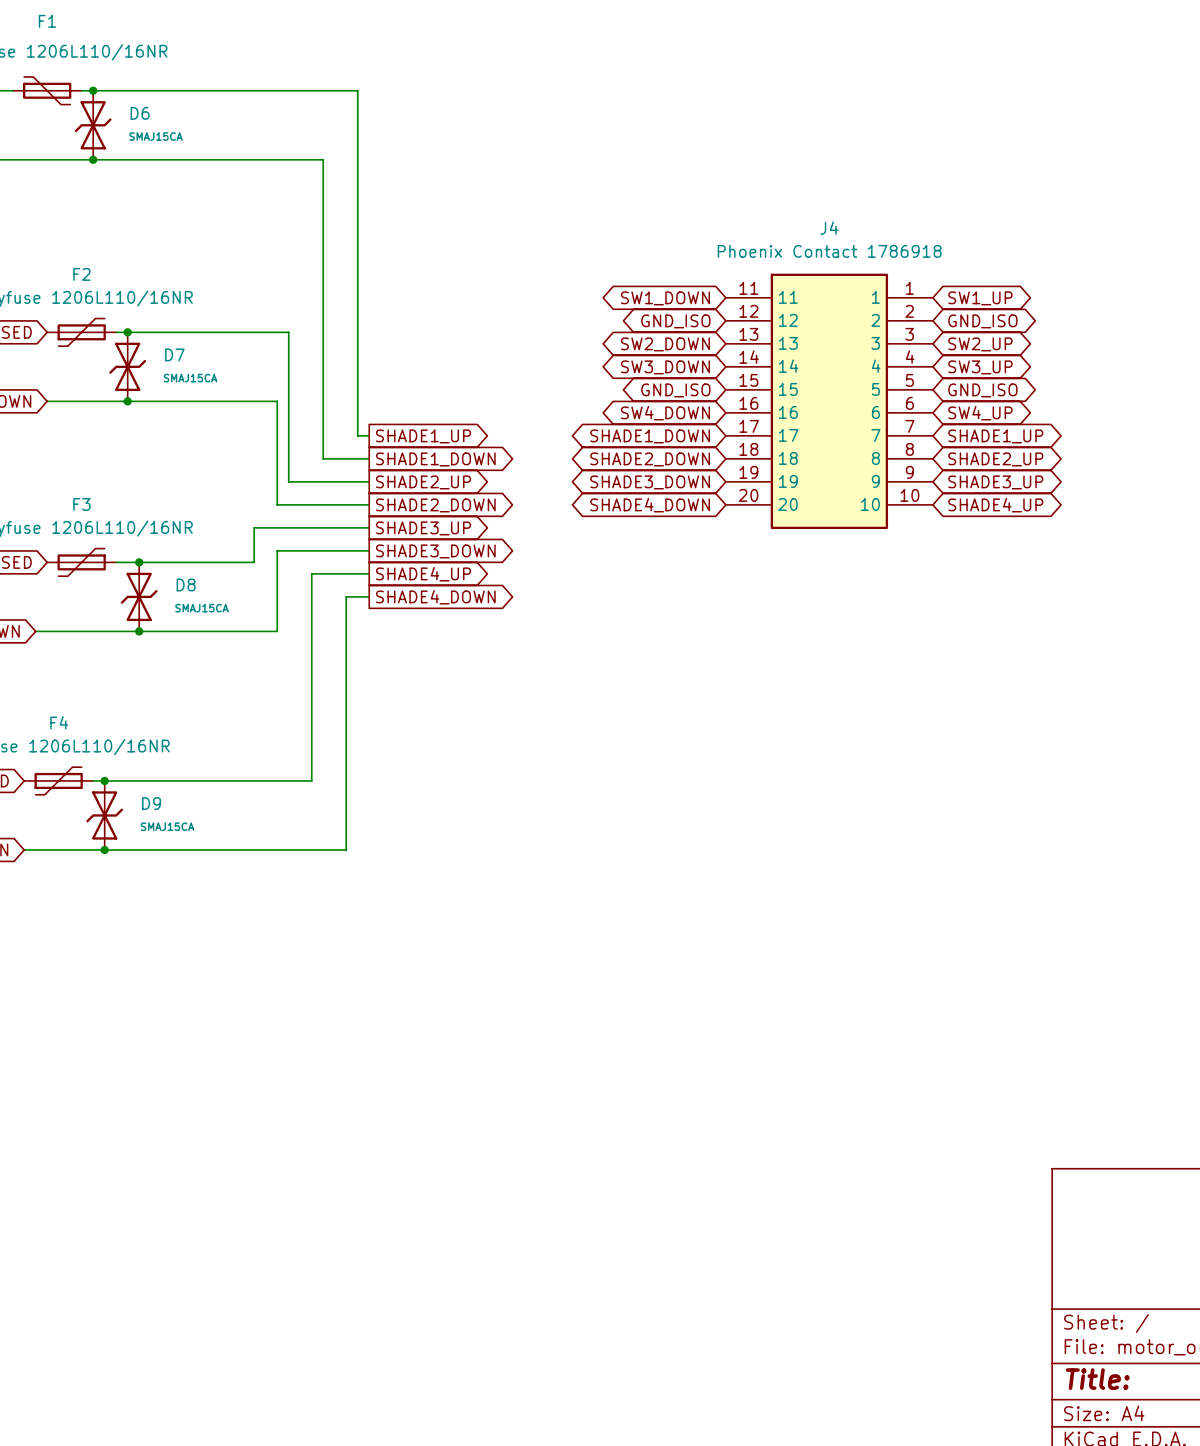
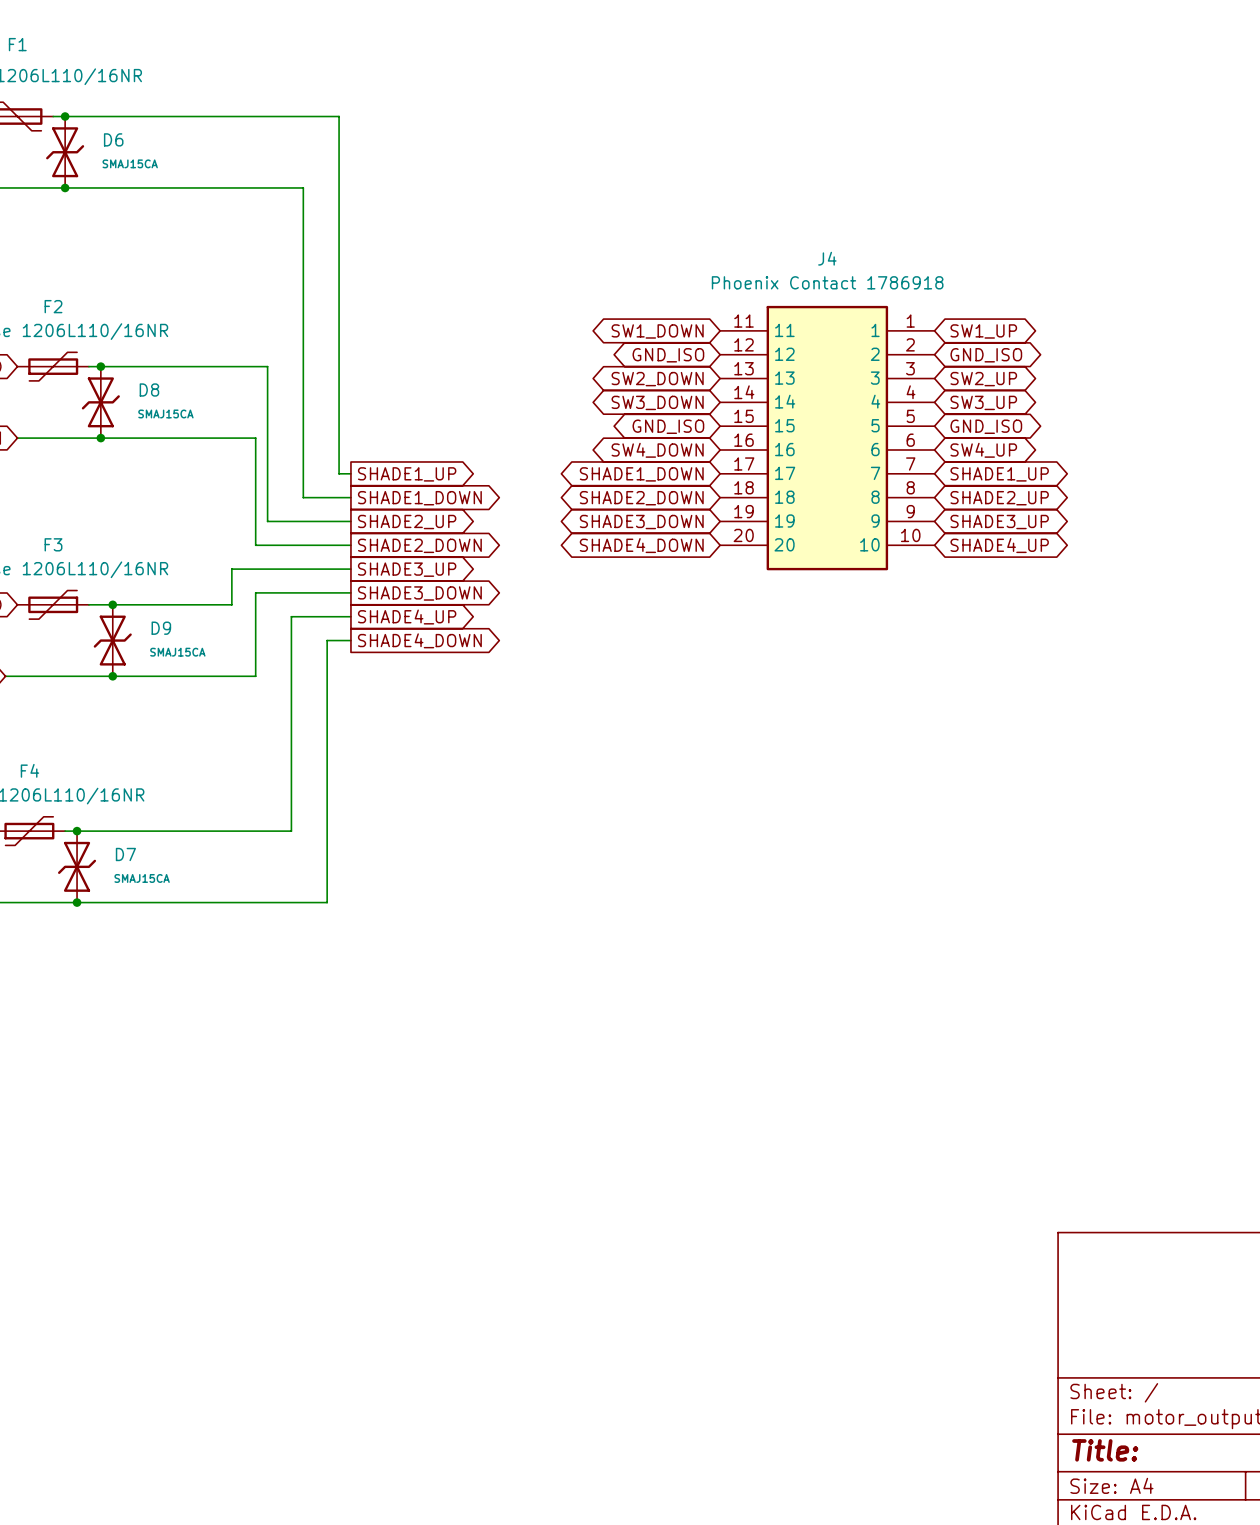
D7 name: D7 (174, 354) -> D8 (149, 390)
D8 name: D8 (186, 584) -> D9 (161, 628)
D9 name: D9 (151, 803) -> D7 (125, 854)

